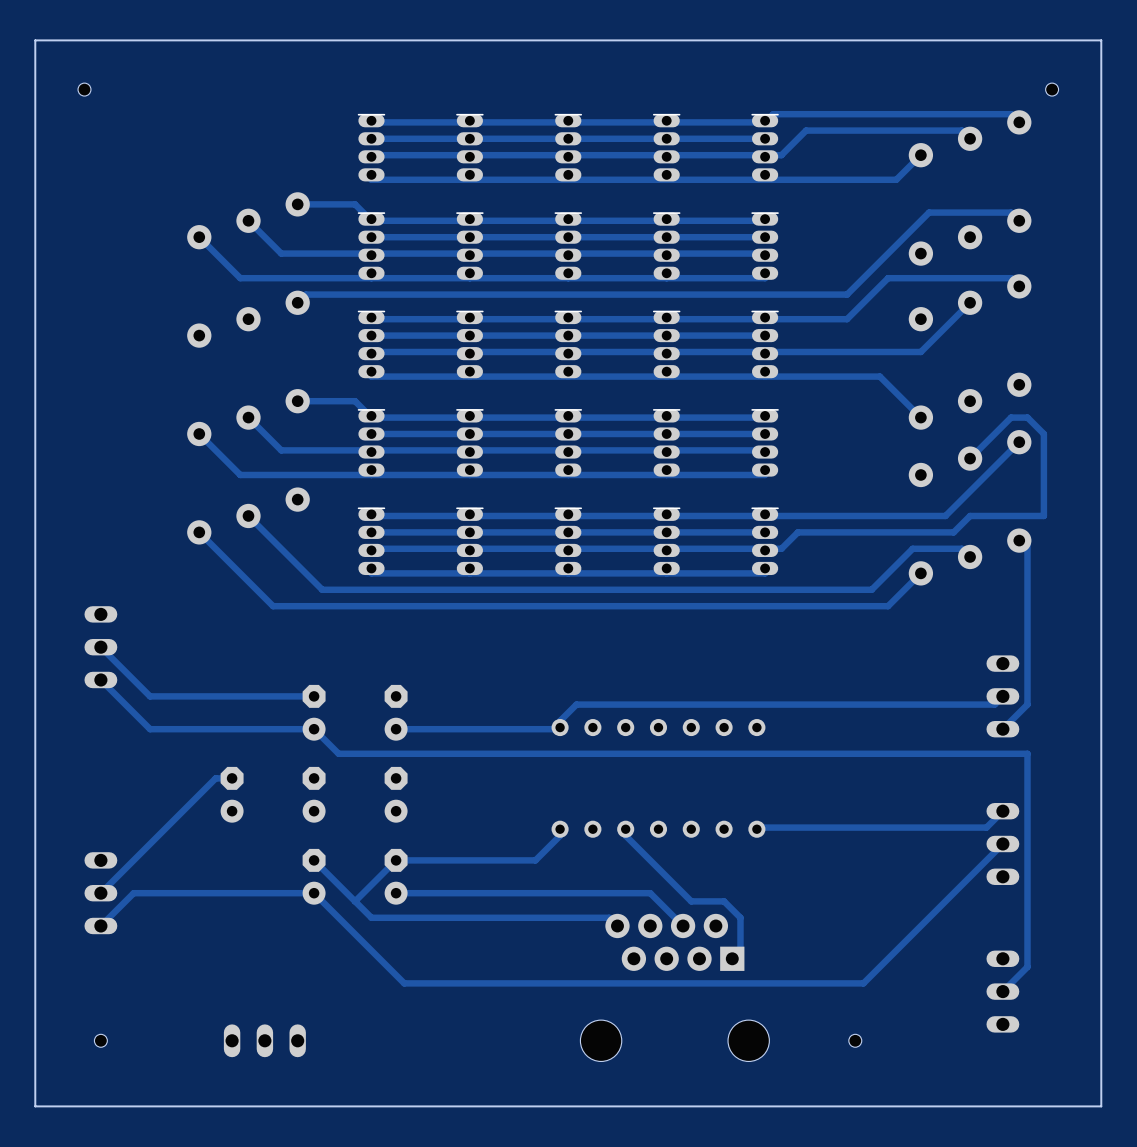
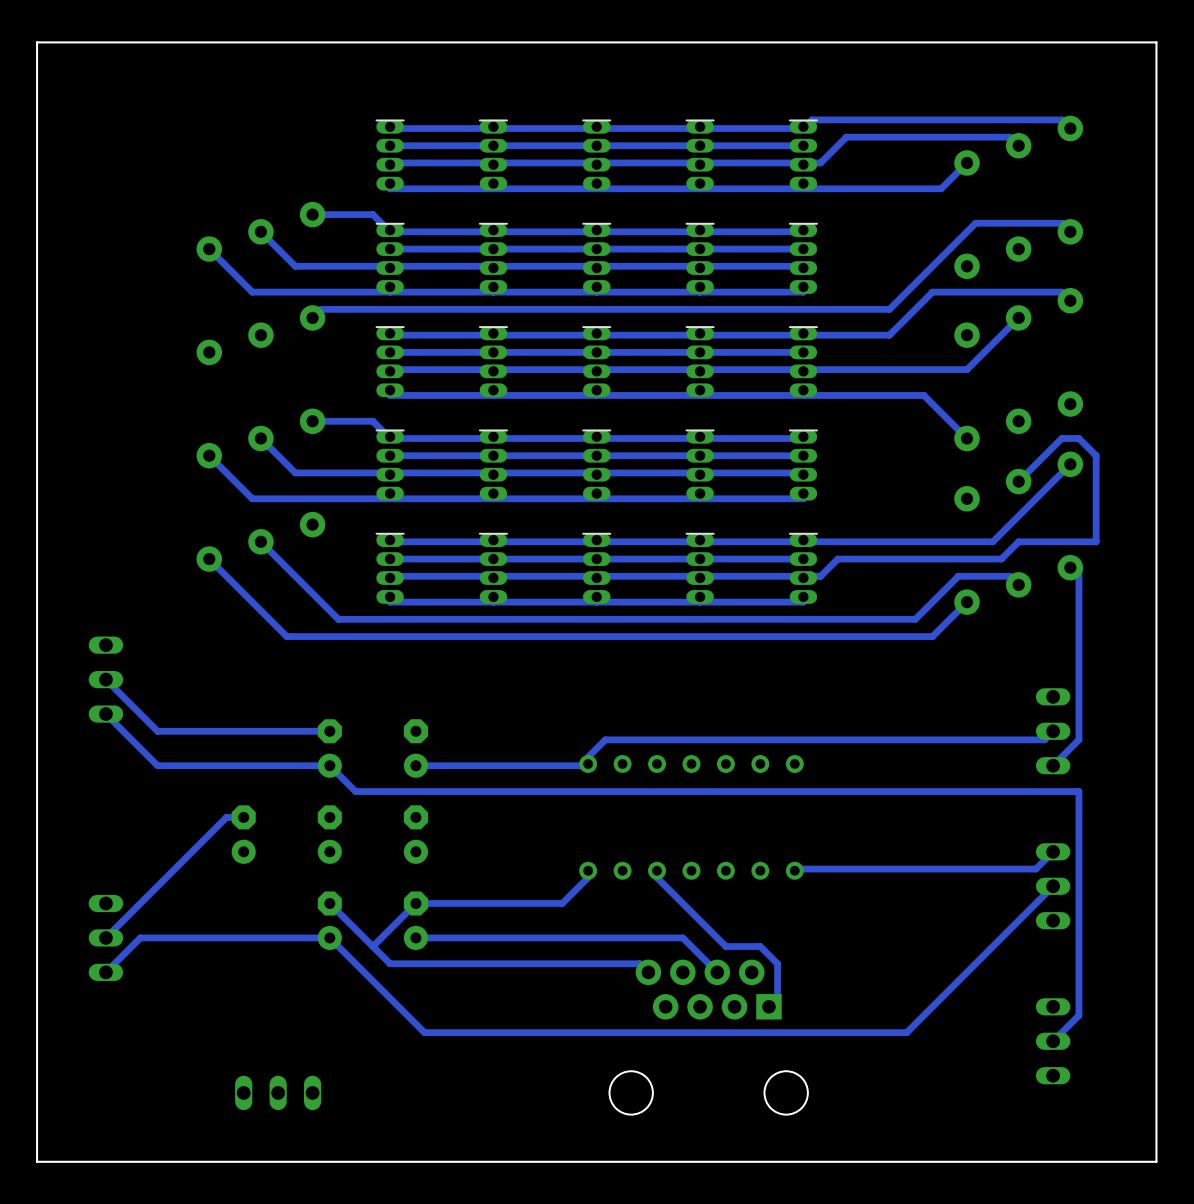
hole: (84, 89) -> none
hole: (1052, 89) -> none
hole: (100, 1040) -> none
hole: (855, 1040) -> none

